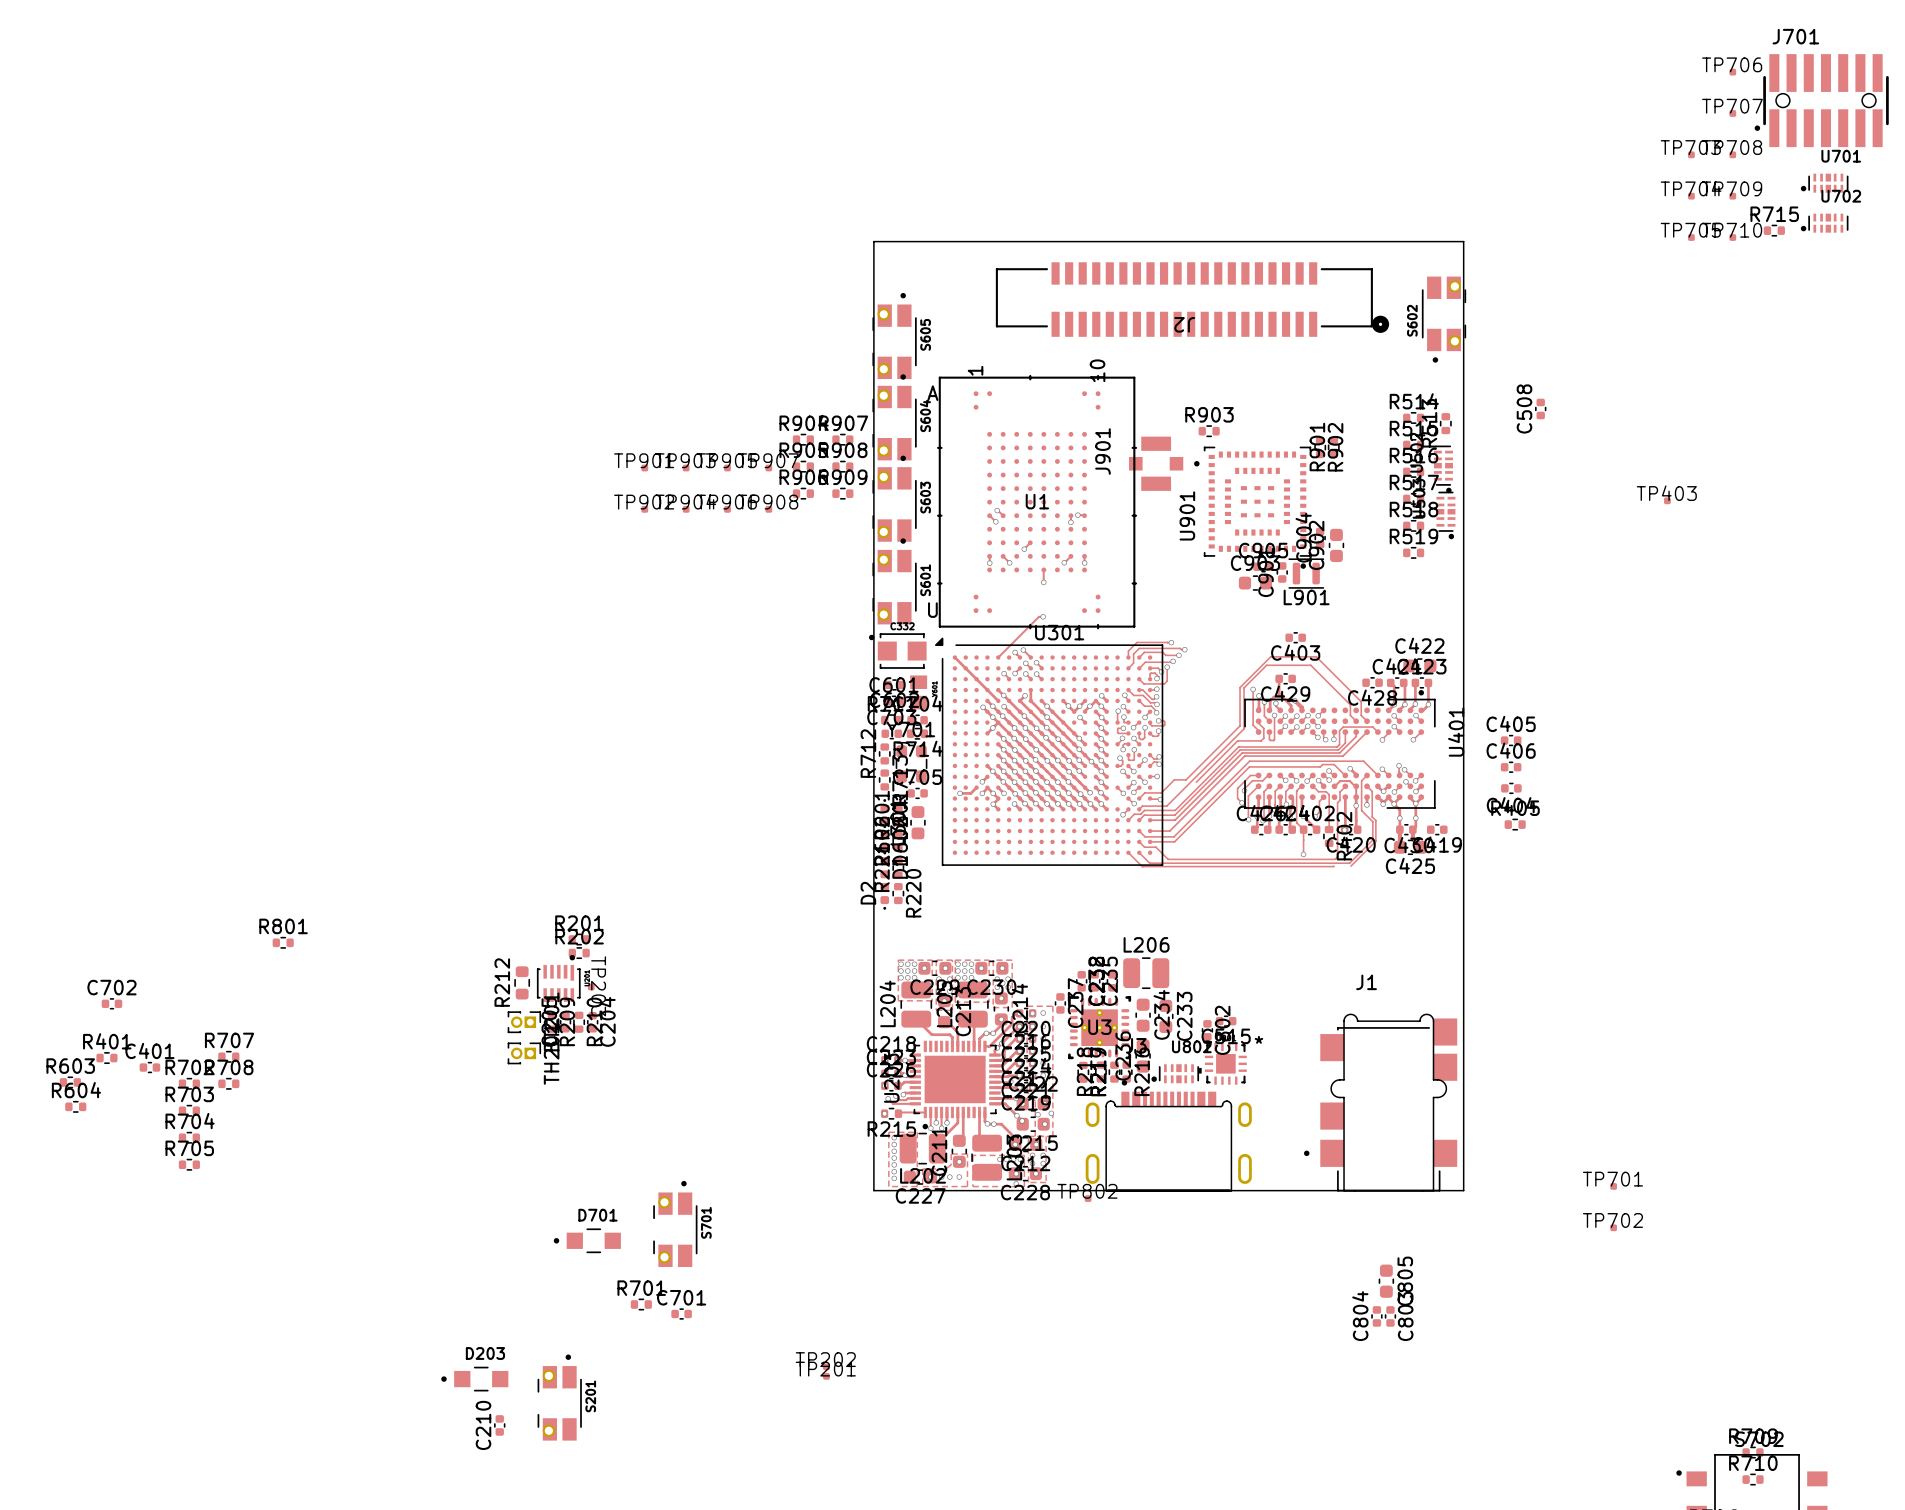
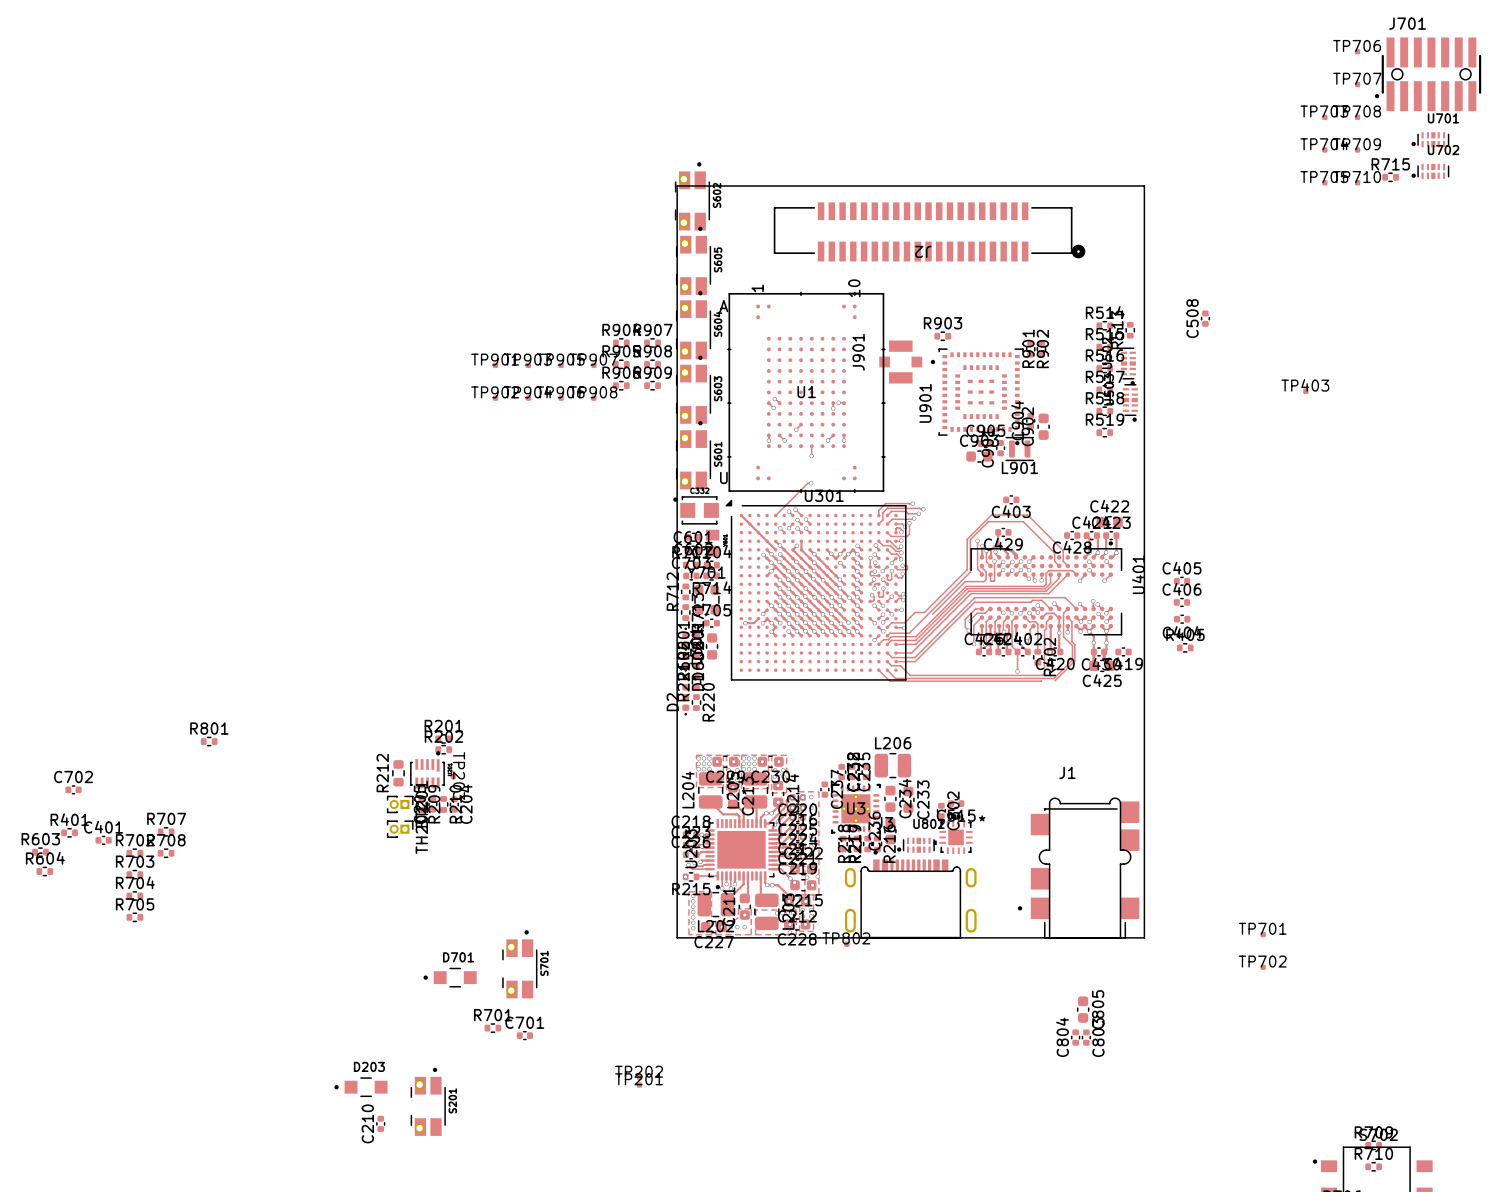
S602 rotation: 0° (1444, 319) -> 180° (692, 196)
S602 position: (1444, 319) -> (692, 196)

